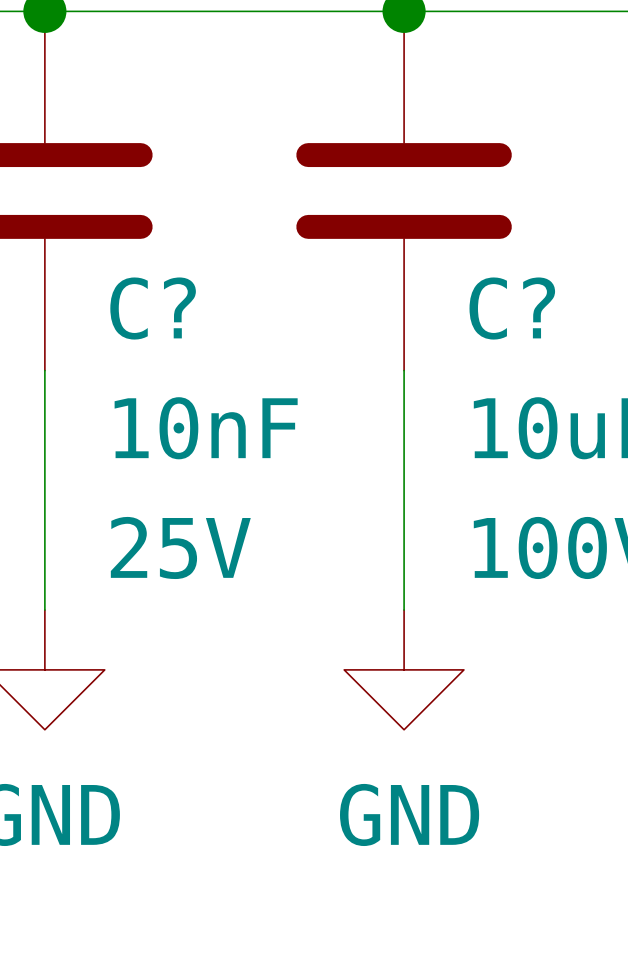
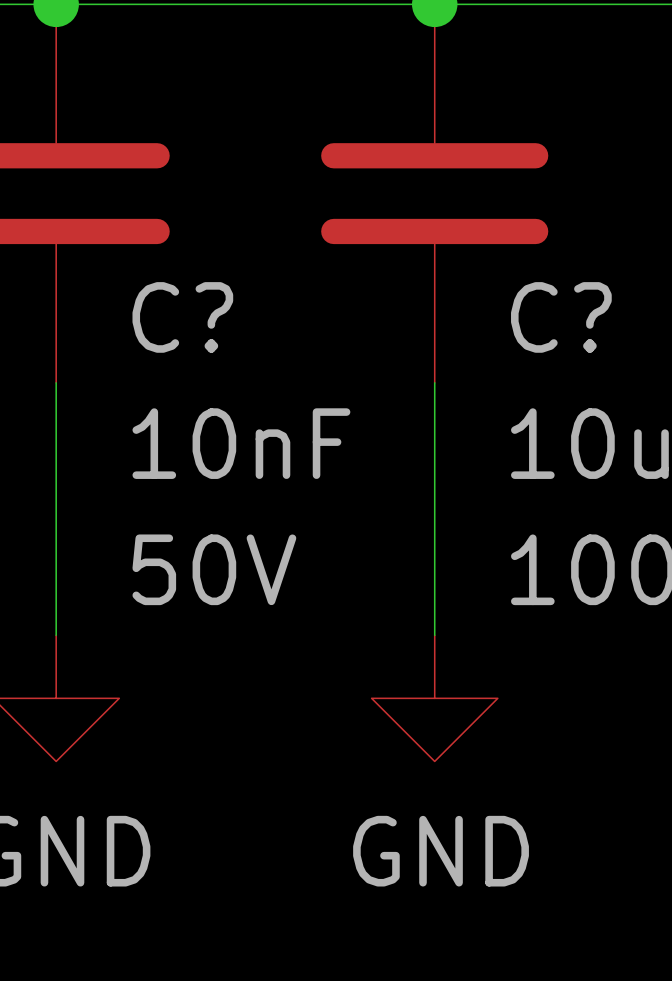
C? text: 25V (180, 547) -> 50V (214, 569)

